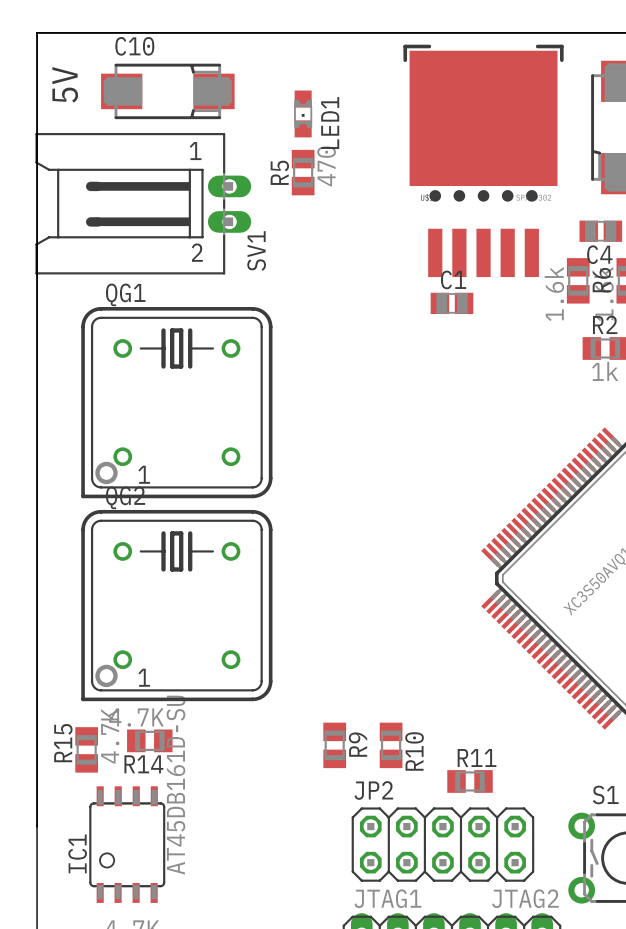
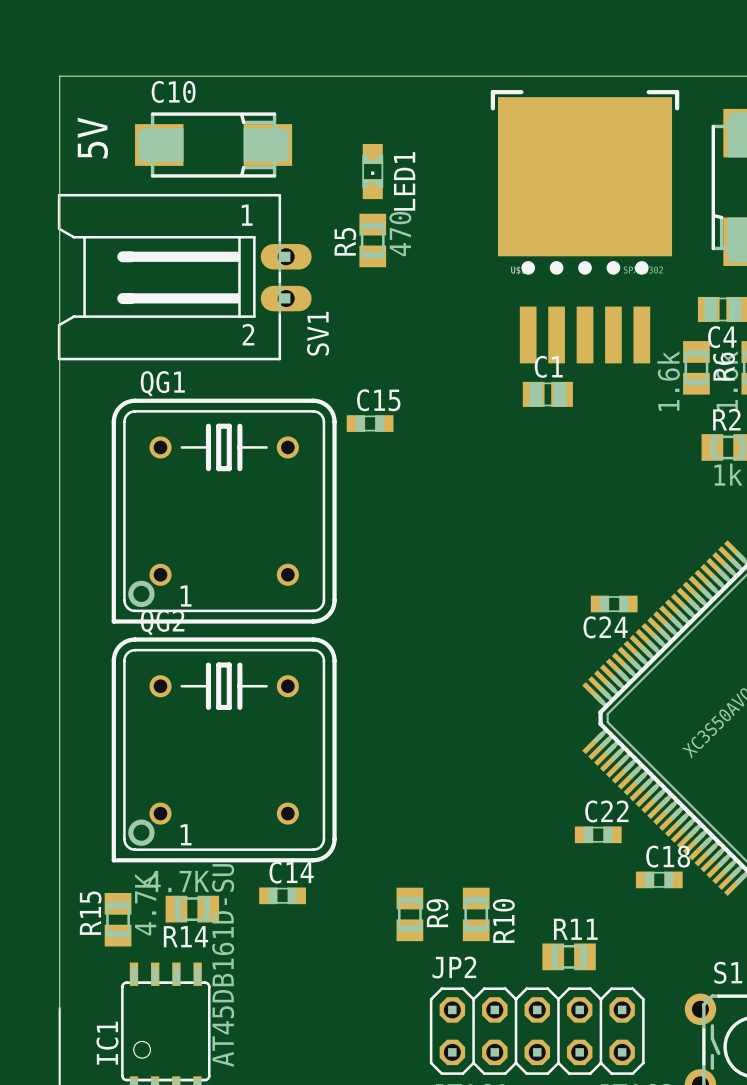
C15: none -> (370, 423)
C24: none -> (614, 603)
C22: none -> (598, 834)
C18: none -> (659, 879)
C14: none -> (282, 895)

